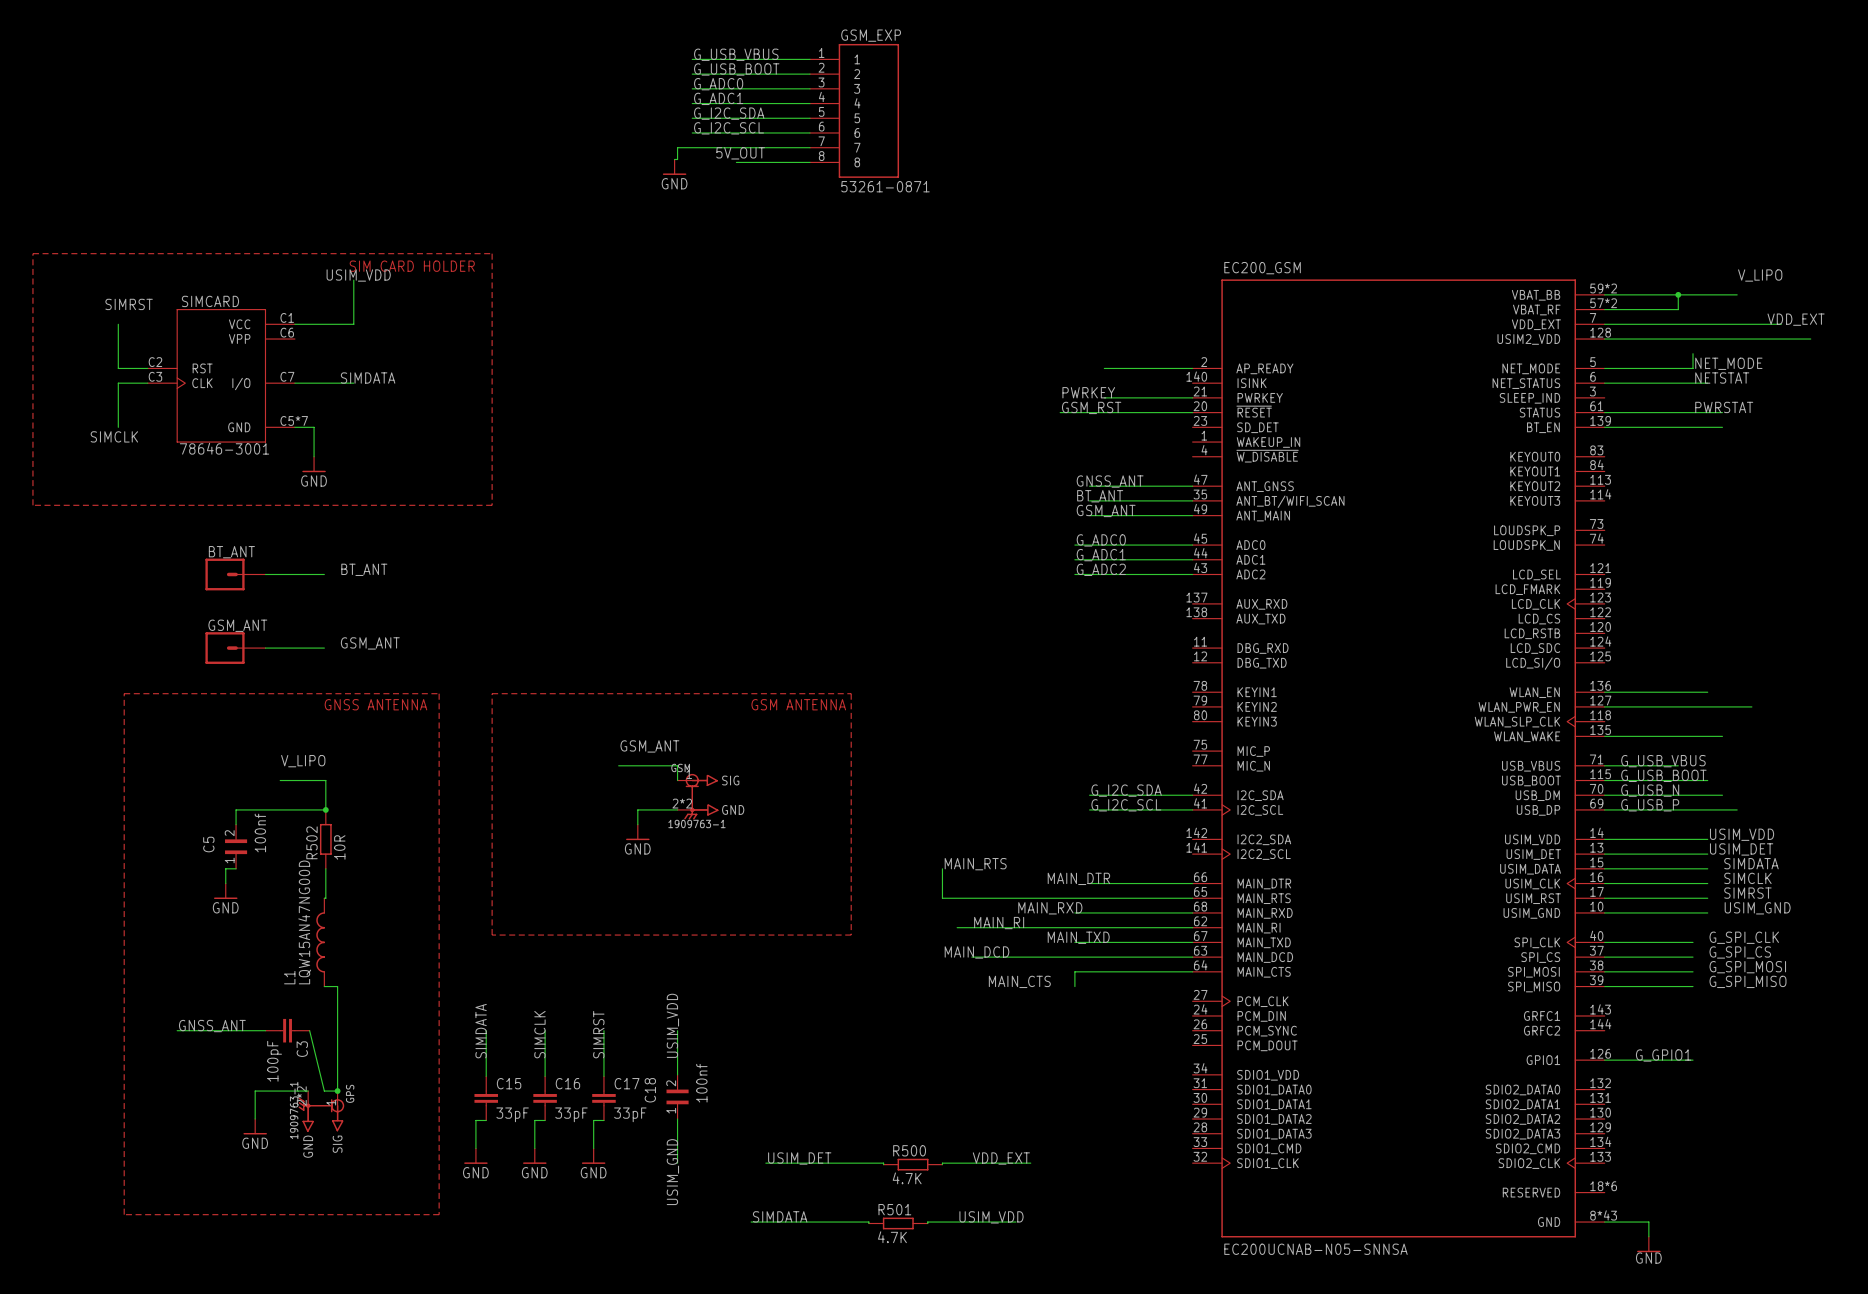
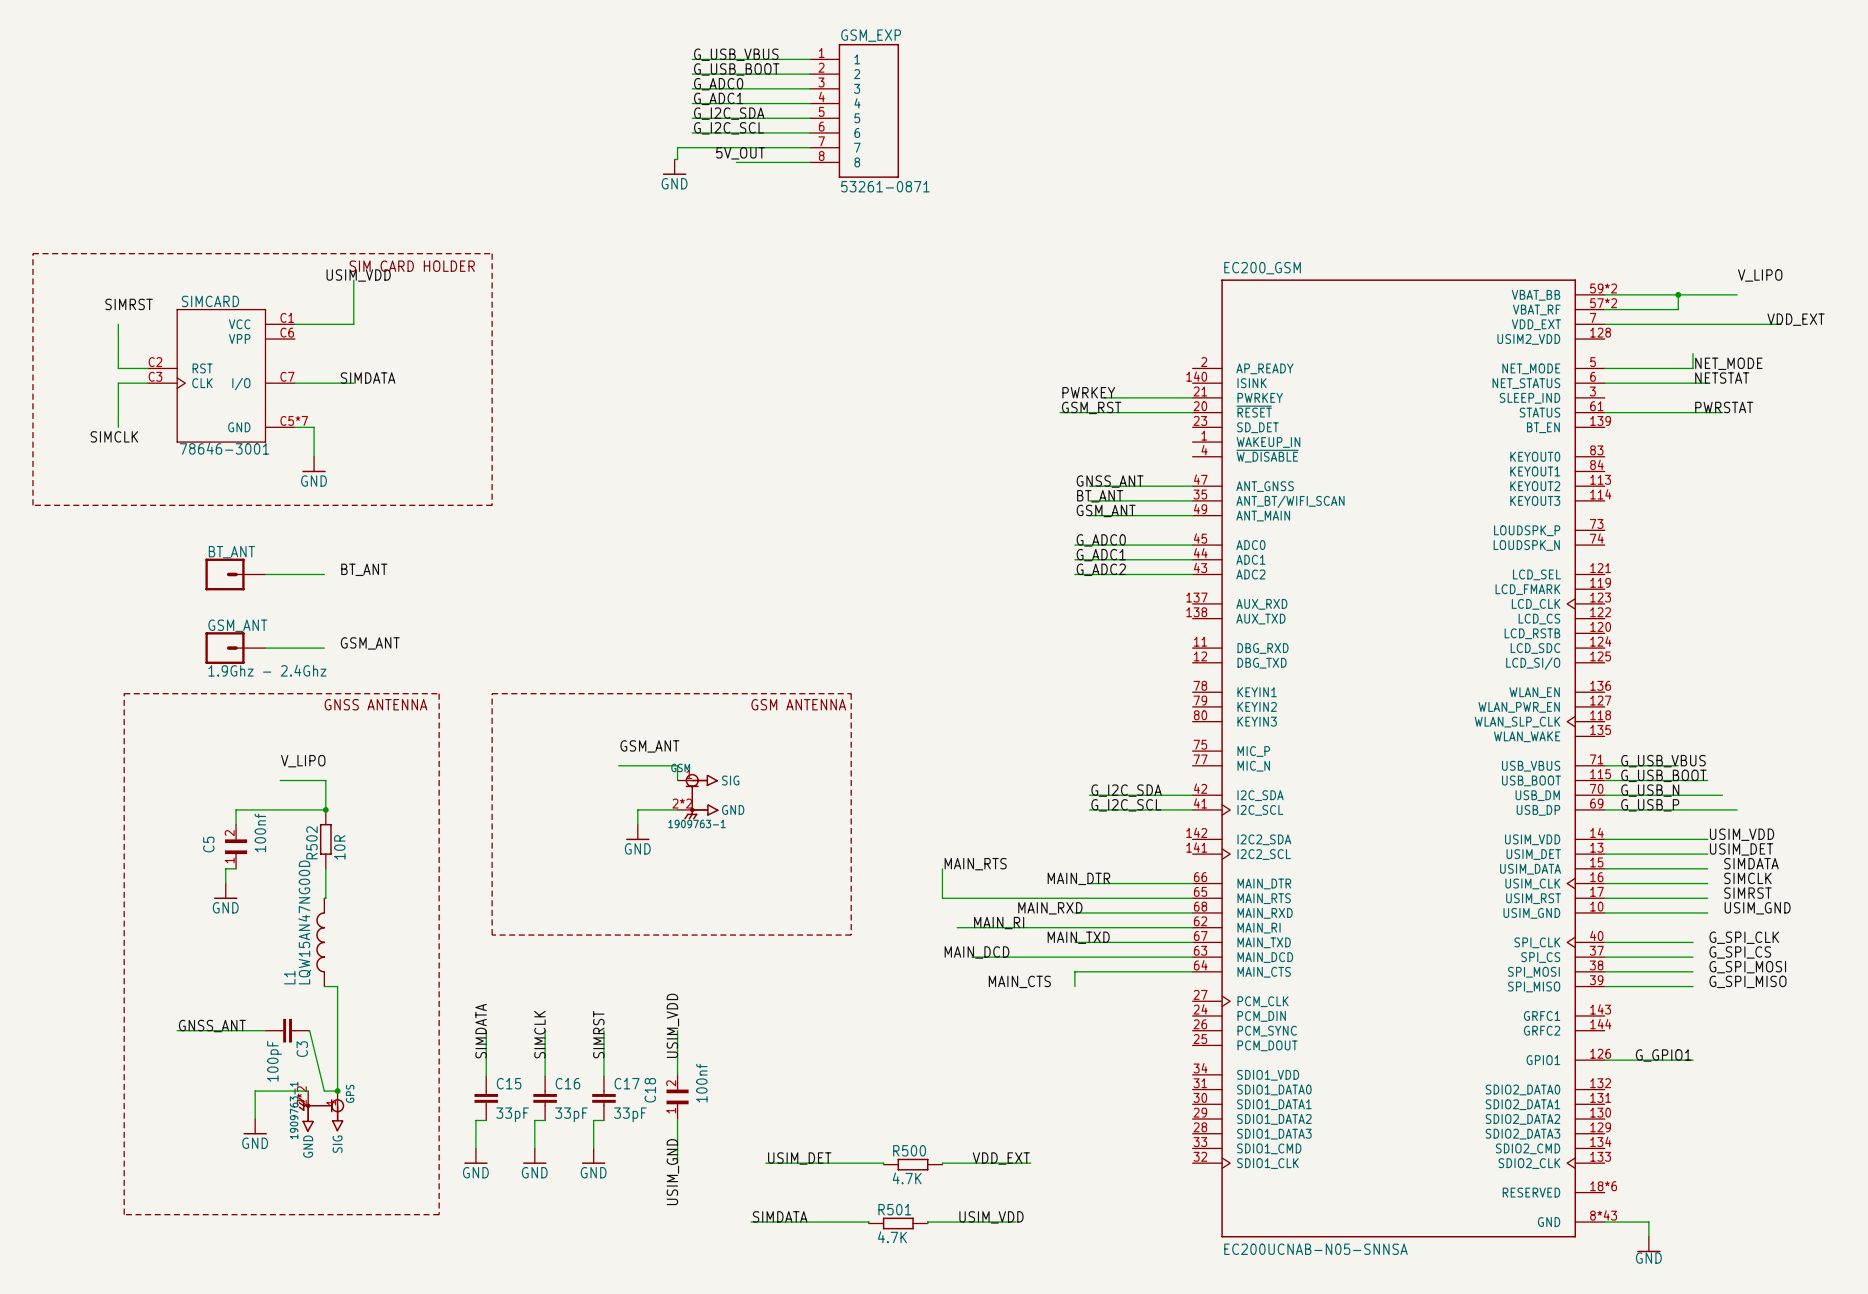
wire: (1604, 339) (1810, 339) -> none
wire: (1104, 368) (1192, 368) -> none
wire: (1604, 427) (1722, 427) -> none
GSM_ANT value: none -> 1.9Ghz - 2.4Ghz (267, 670)
wire: (1604, 692) (1707, 692) -> none
wire: (1604, 706) (1751, 706) -> none
wire: (1604, 736) (1722, 736) -> none

